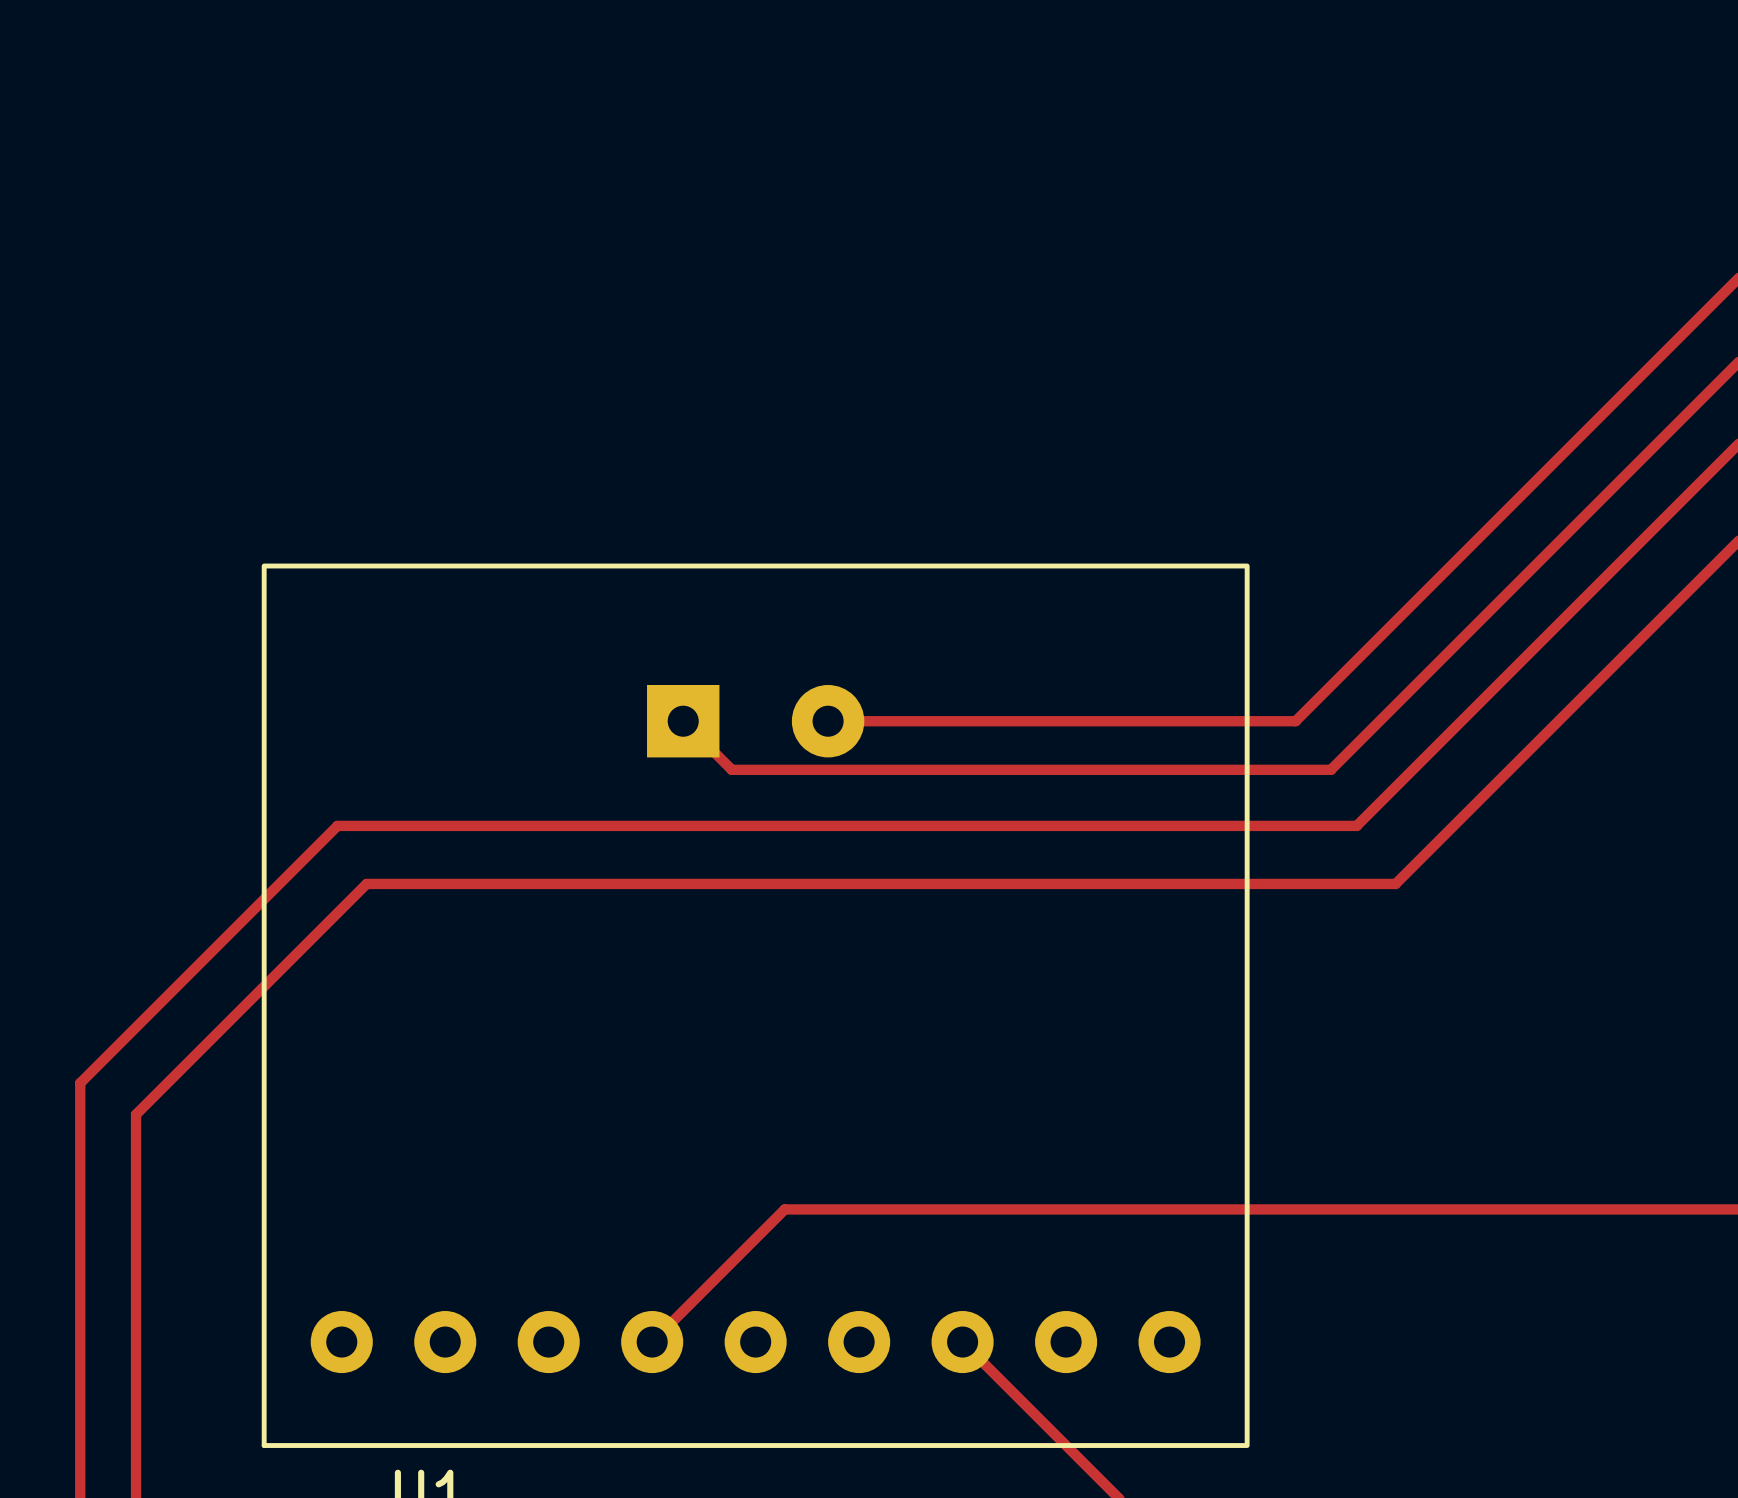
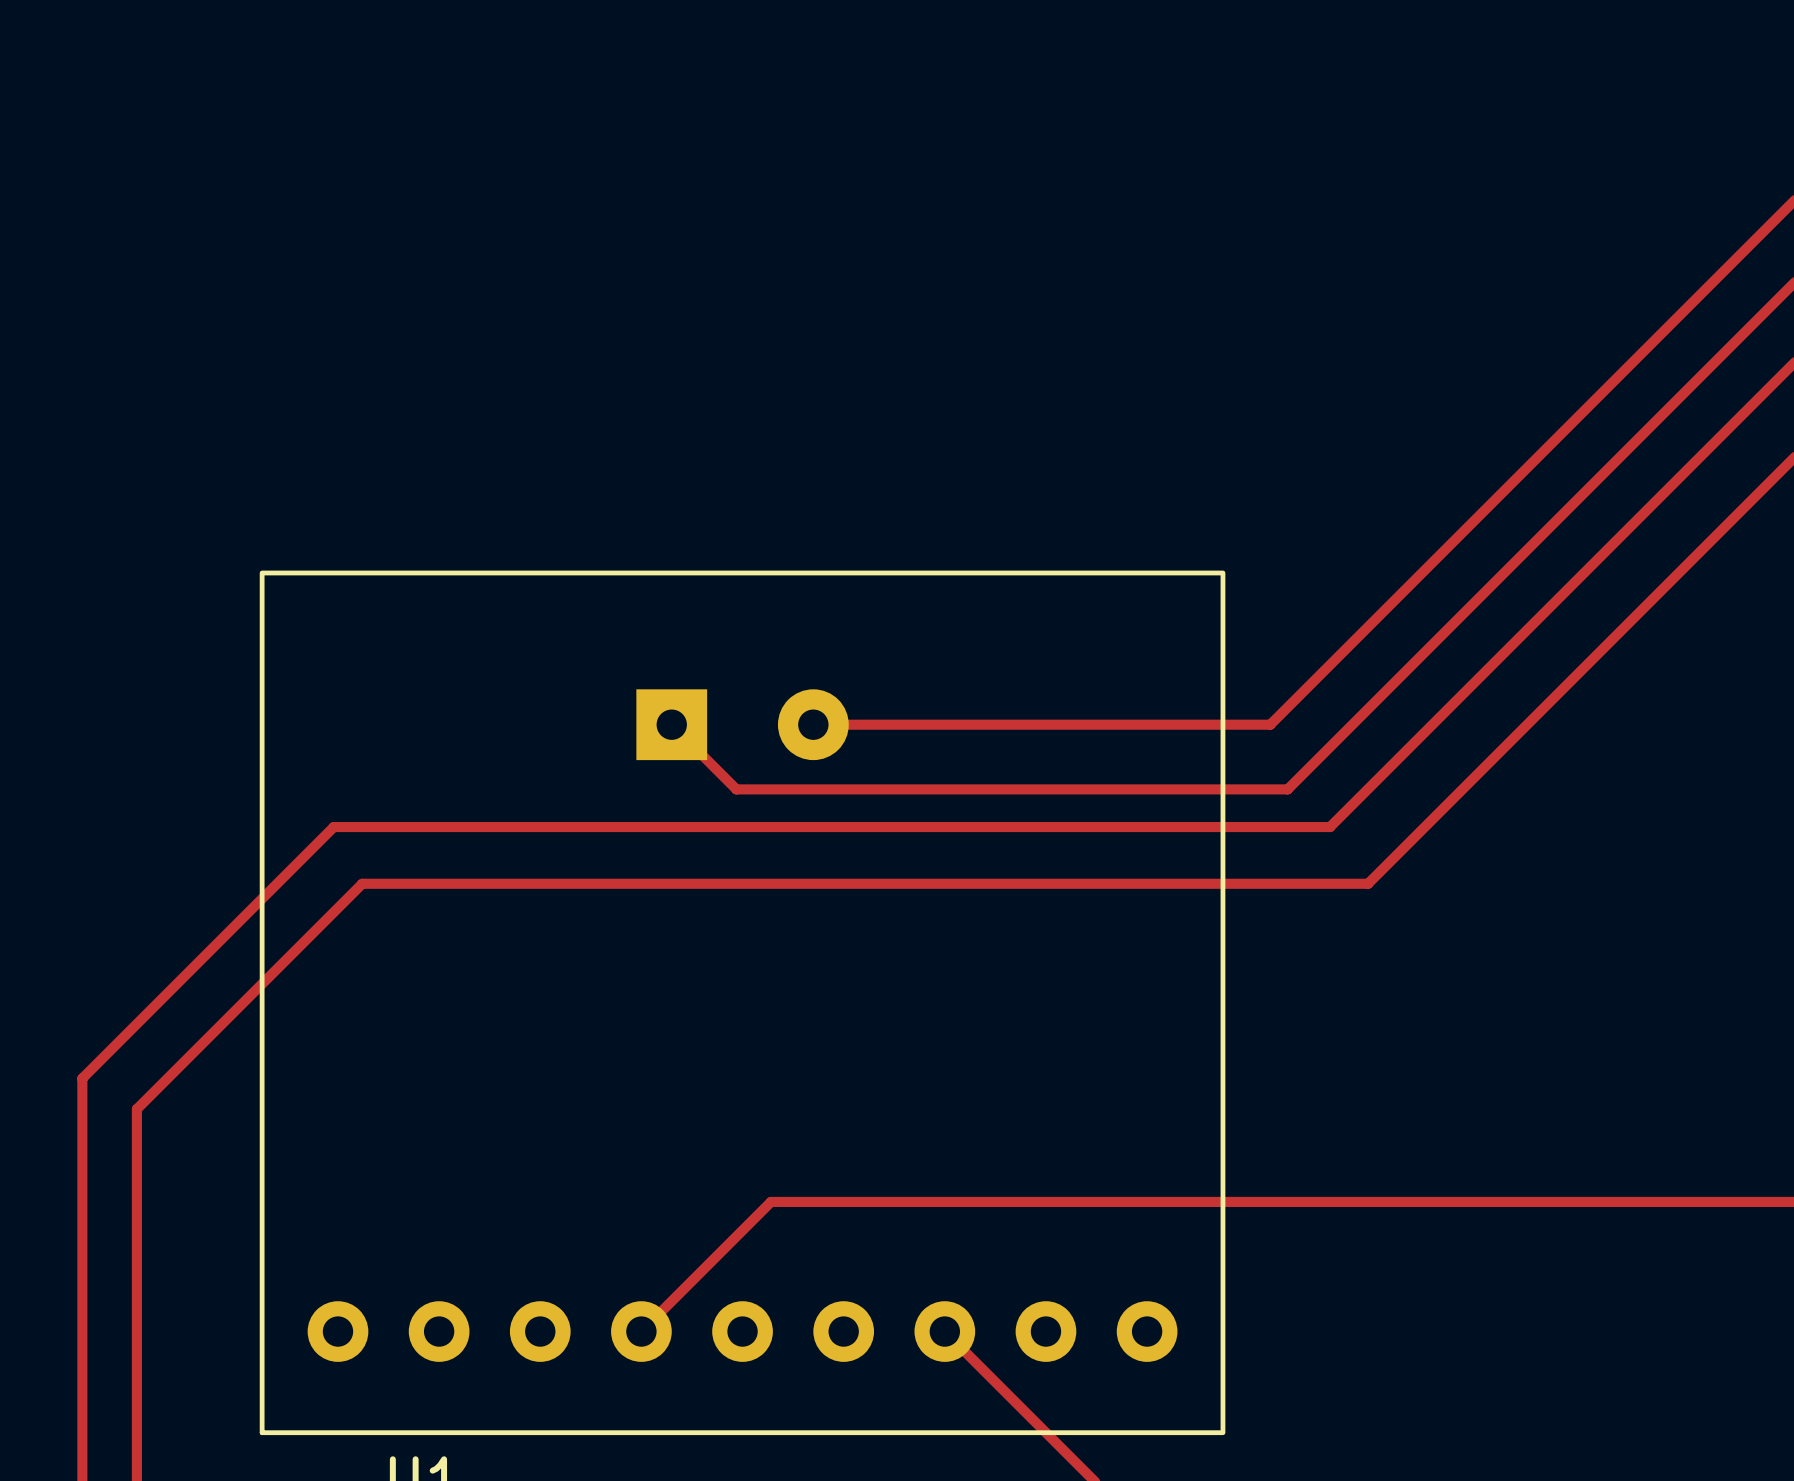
track: (731, 769) (1330, 769) -> (719, 772) (736, 789) (1287, 789) (1304, 772)

